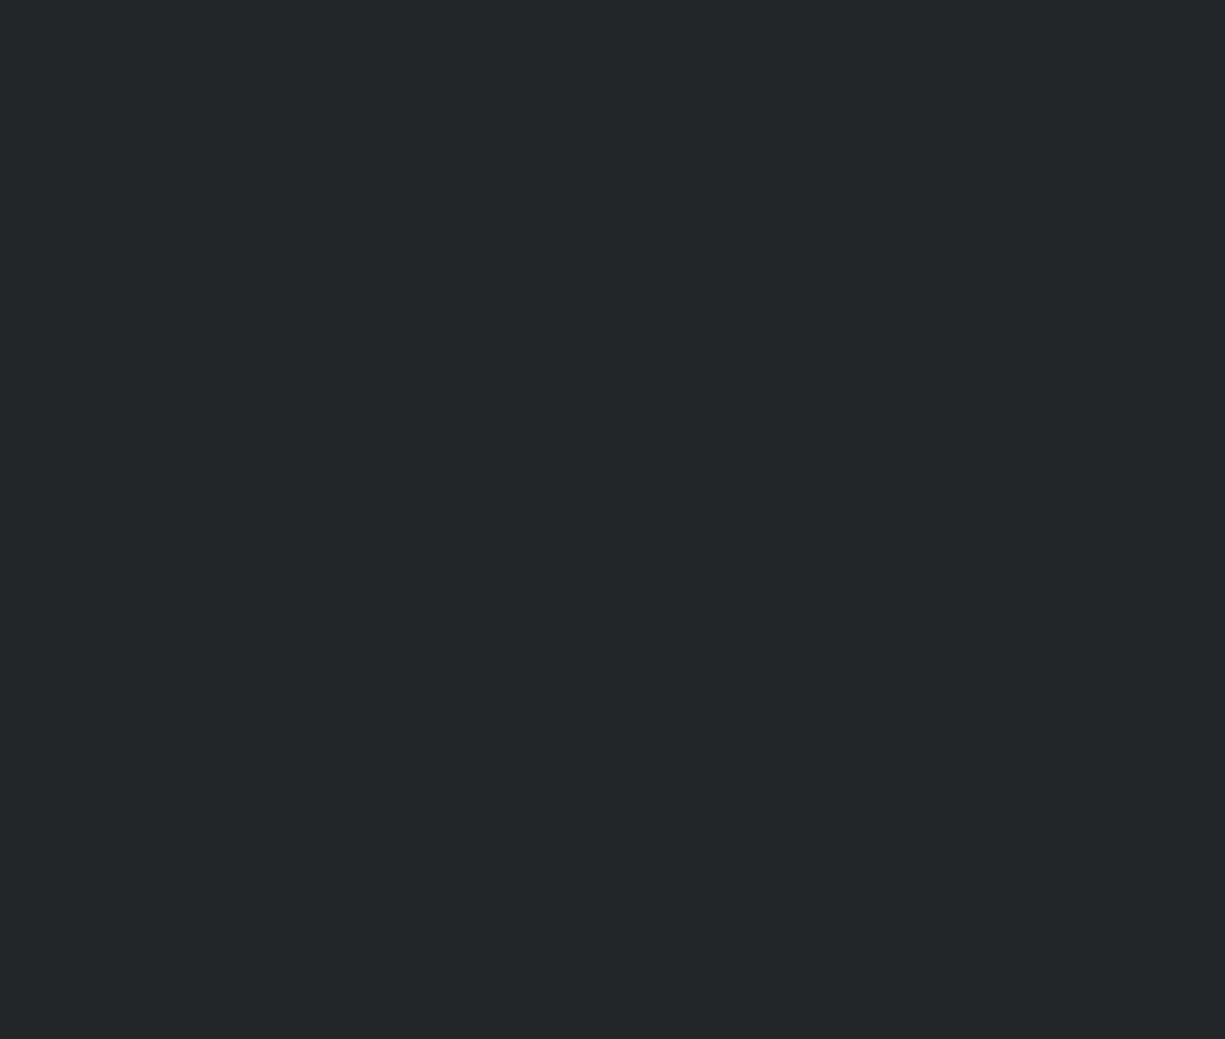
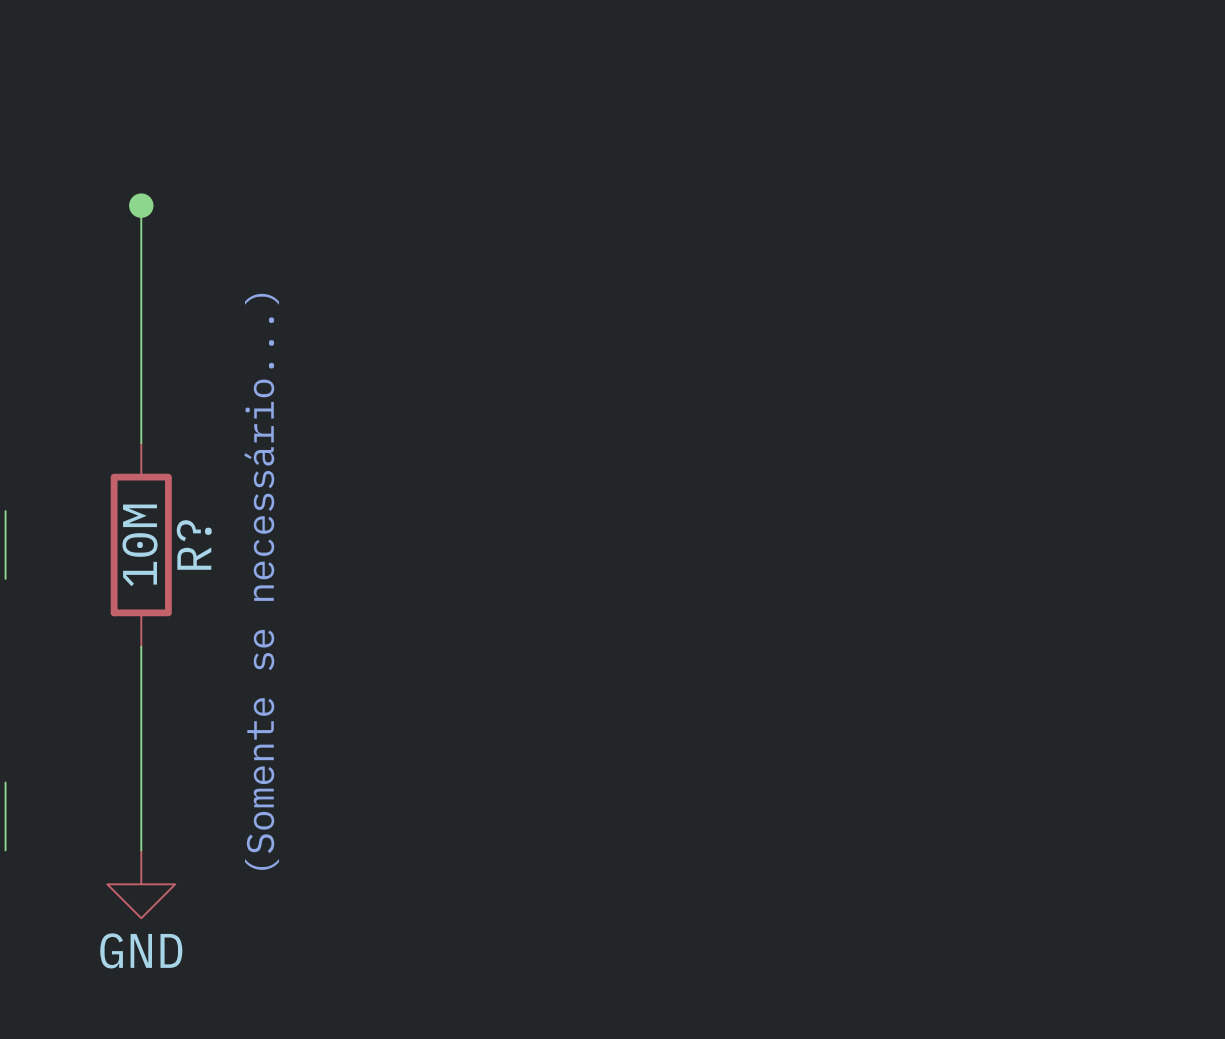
wire: none -> (141, 205) (141, 443)
junction: none -> (141, 205)
wire: none -> (5, 511) (5, 578)
R?: none -> 10M (141, 544)
text: none -> (Somente se necessário...) (261, 581)
wire: none -> (141, 646) (141, 850)
wire: none -> (5, 782) (5, 850)
power symbol: none -> GND (141, 884)

